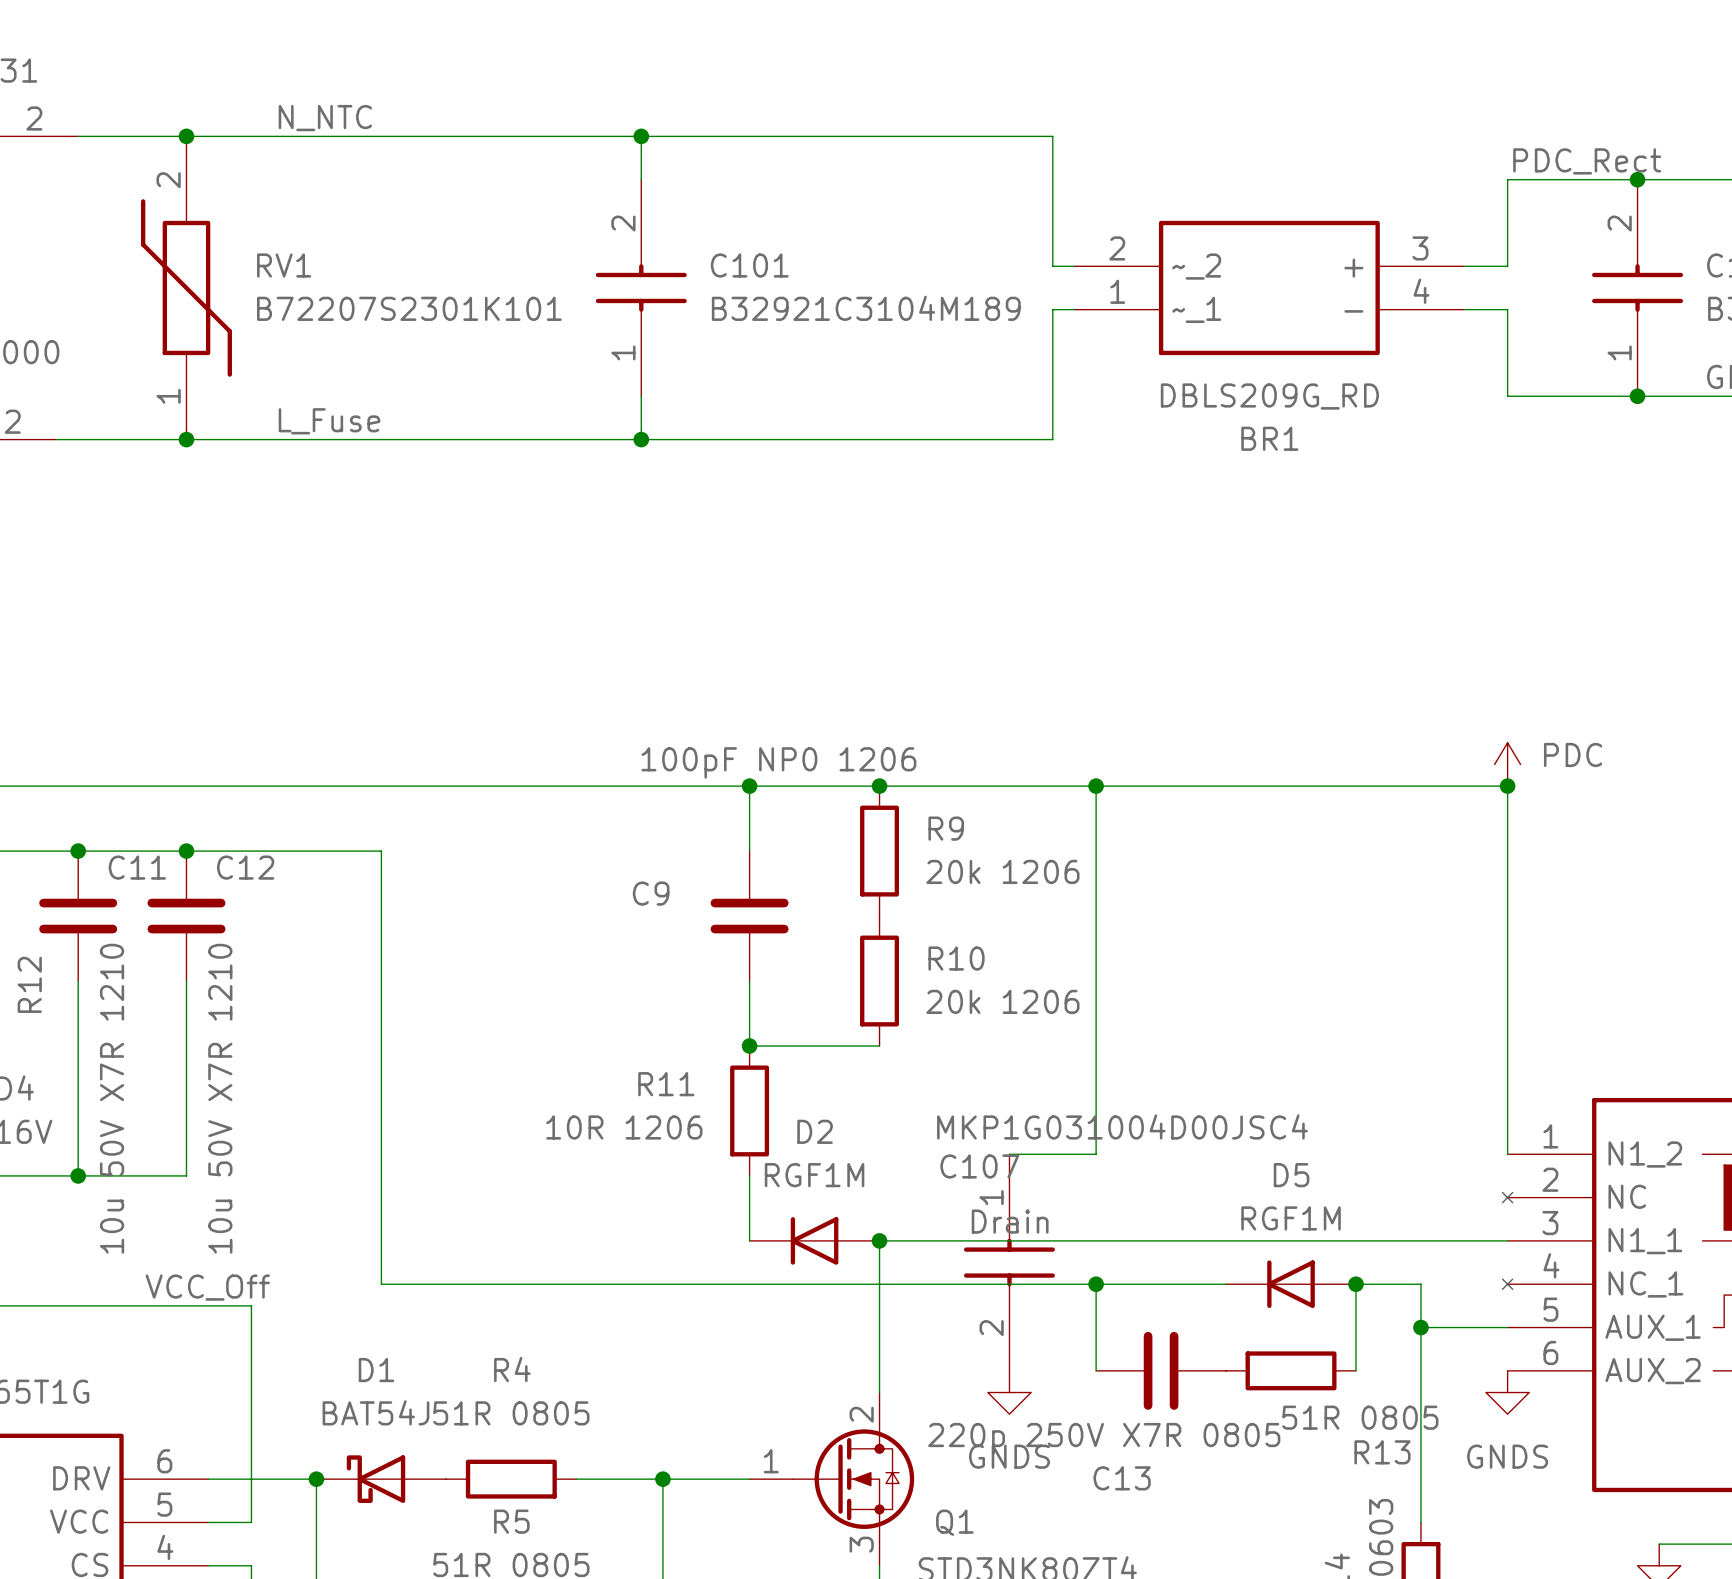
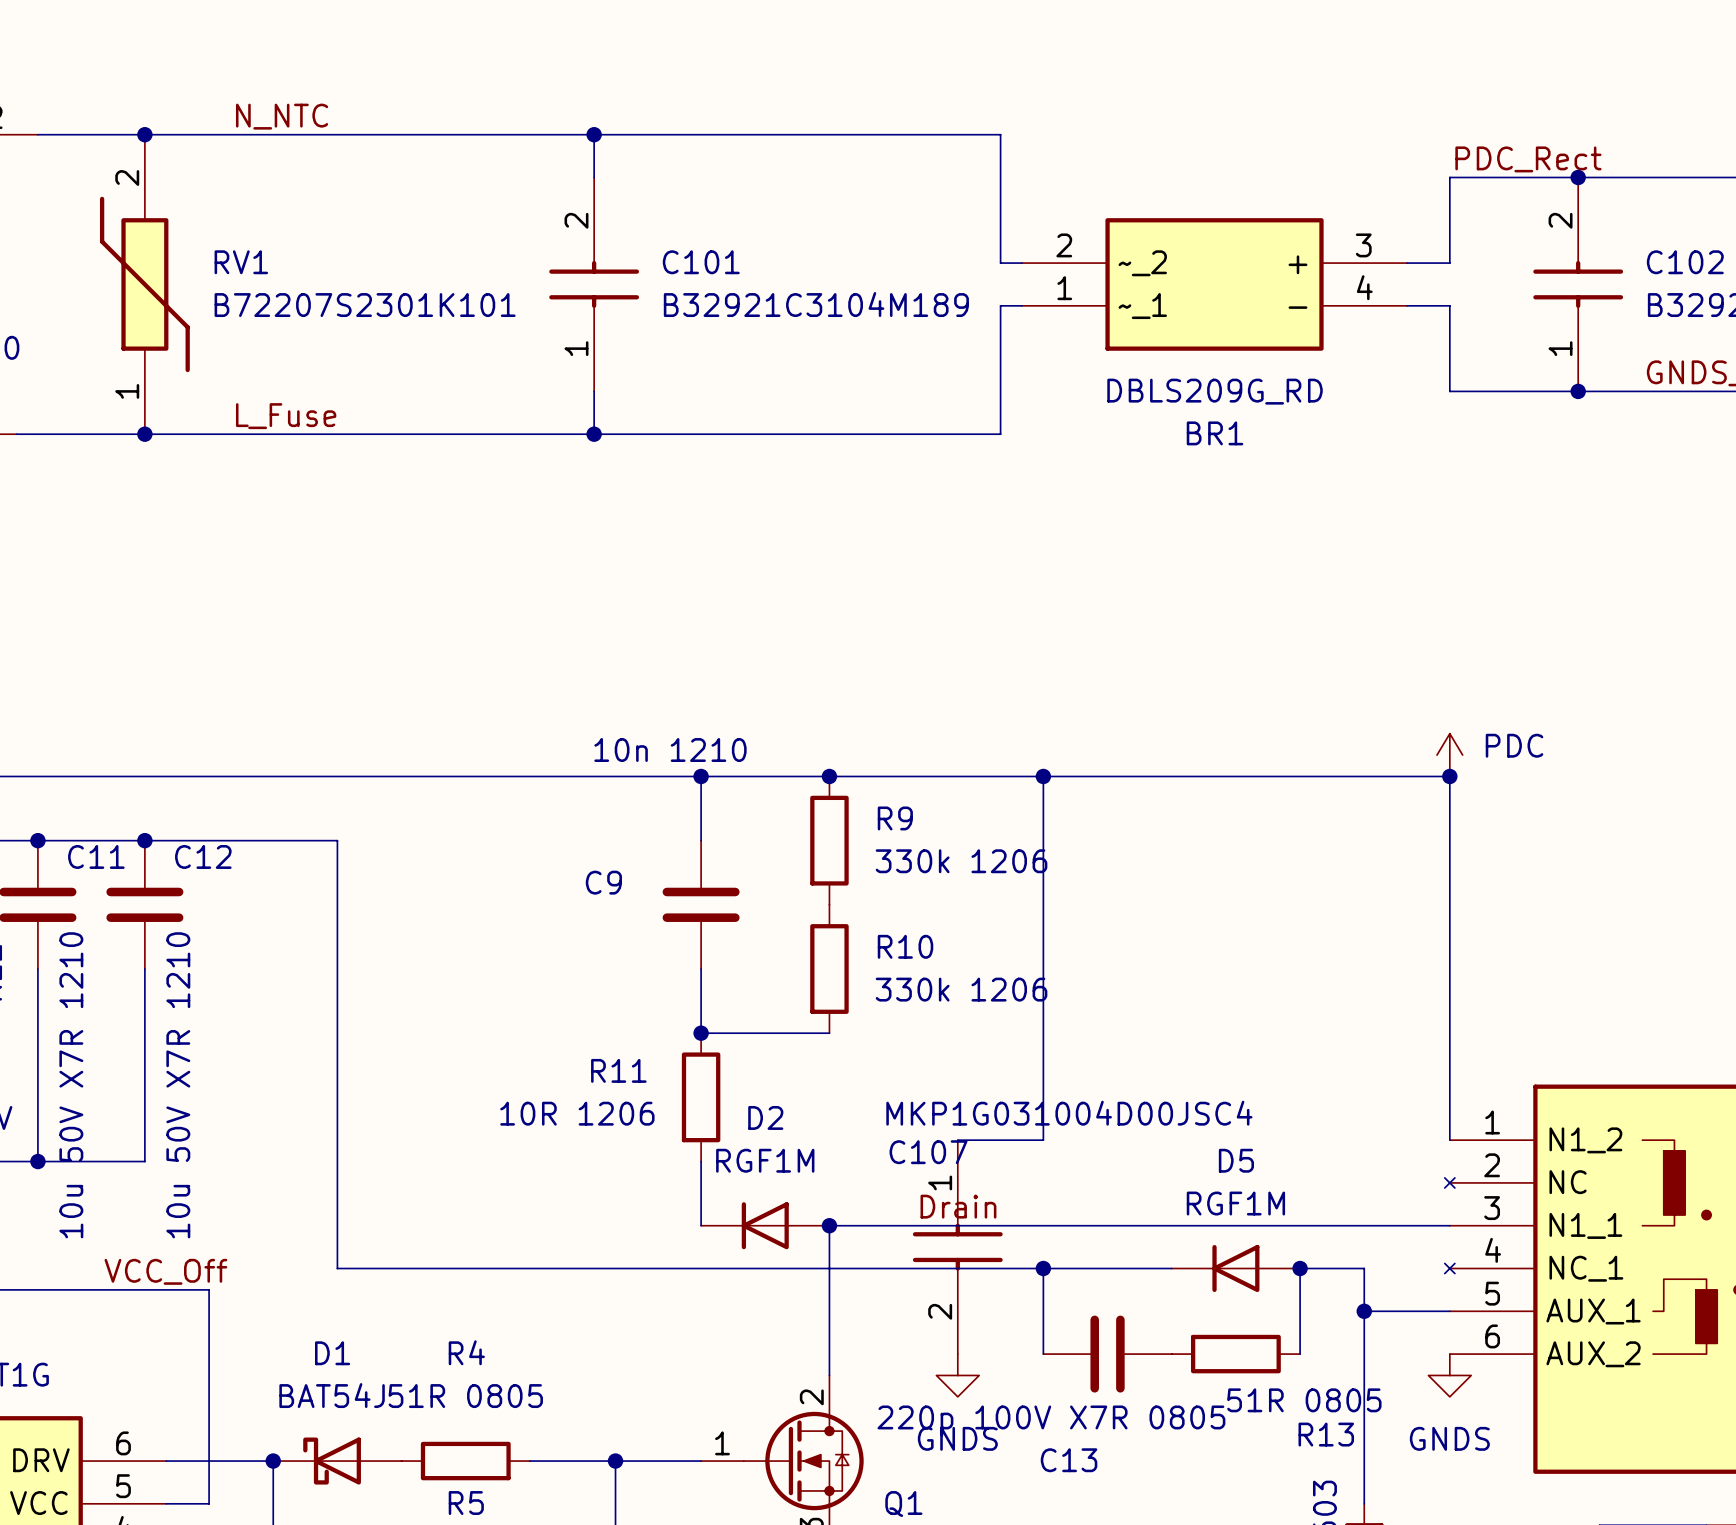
C9 value: 100pF NP0 1206 (778, 762) -> 10n 1210 (670, 750)
R9 value: 20k 1206 (1002, 871) -> 330k 1206 (961, 861)
R10 value: 20k 1206 (1002, 1001) -> 330k 1206 (961, 989)
C13 value: 220p 250V X7R 0805 (1104, 1438) -> 220p 100V X7R 0805 (1051, 1421)

